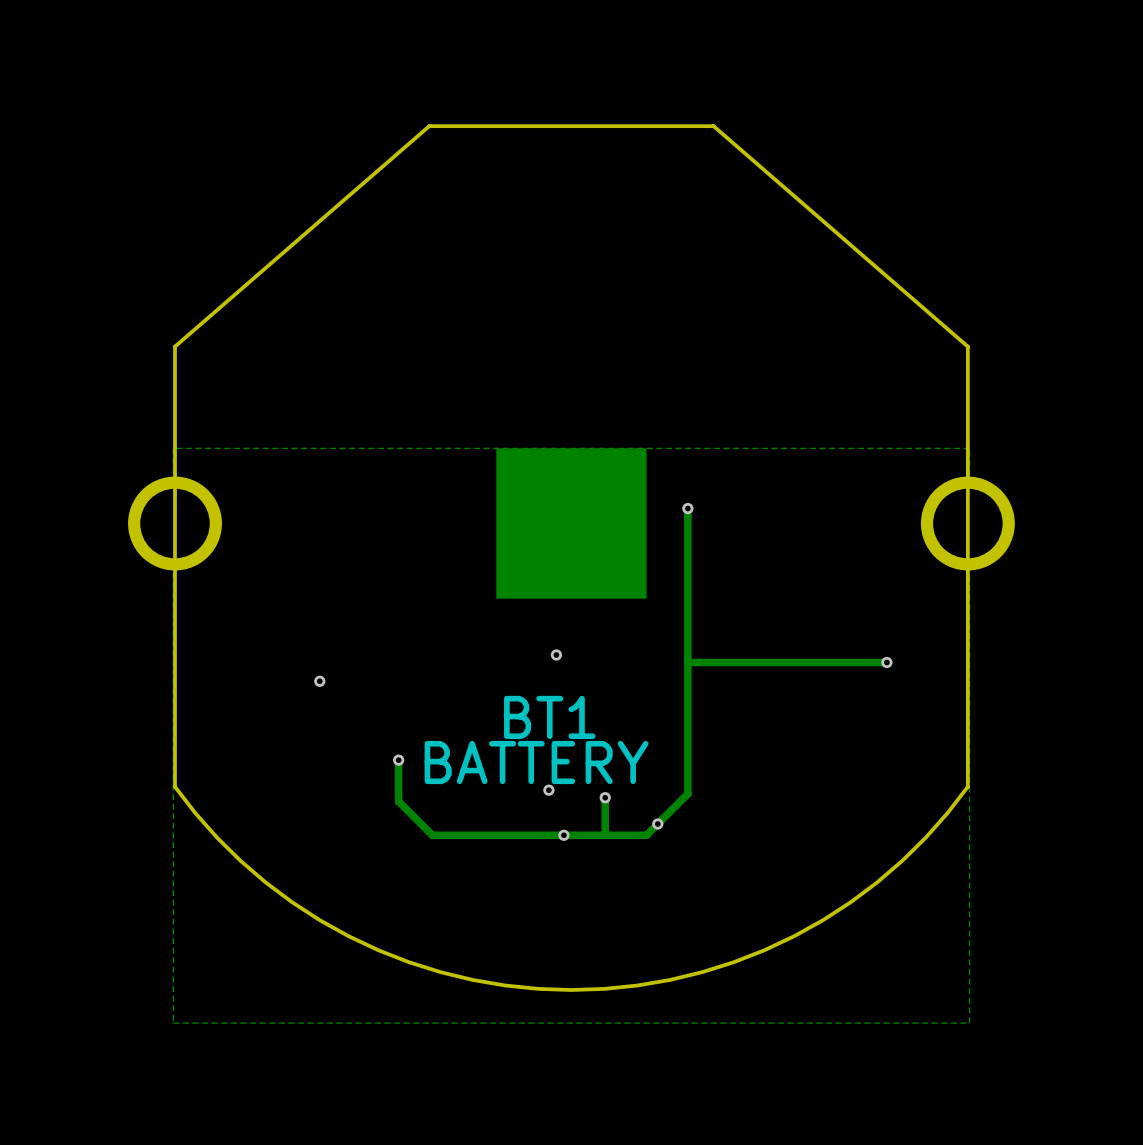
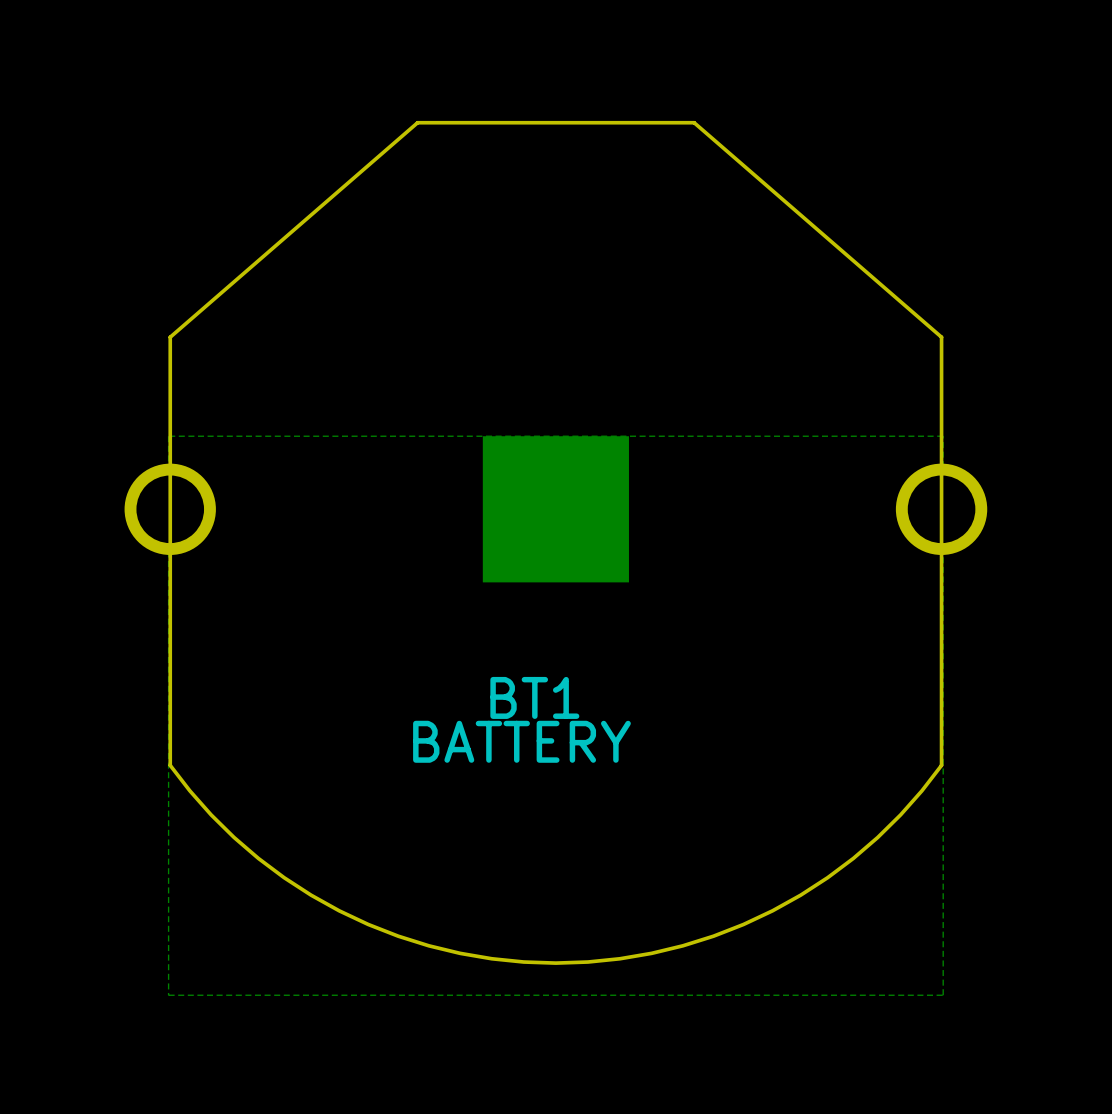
track: (687, 508) (687, 793) (646, 835) (432, 835) (398, 801) (398, 760) -> none
via: (687, 508) -> none
via: (556, 654) -> none
track: (886, 662) (687, 662) -> none
via: (886, 662) -> none
via: (319, 681) -> none
via: (398, 760) -> none
via: (548, 790) -> none
track: (605, 797) (605, 835) -> none
via: (605, 797) -> none
via: (657, 824) -> none
via: (563, 835) -> none

